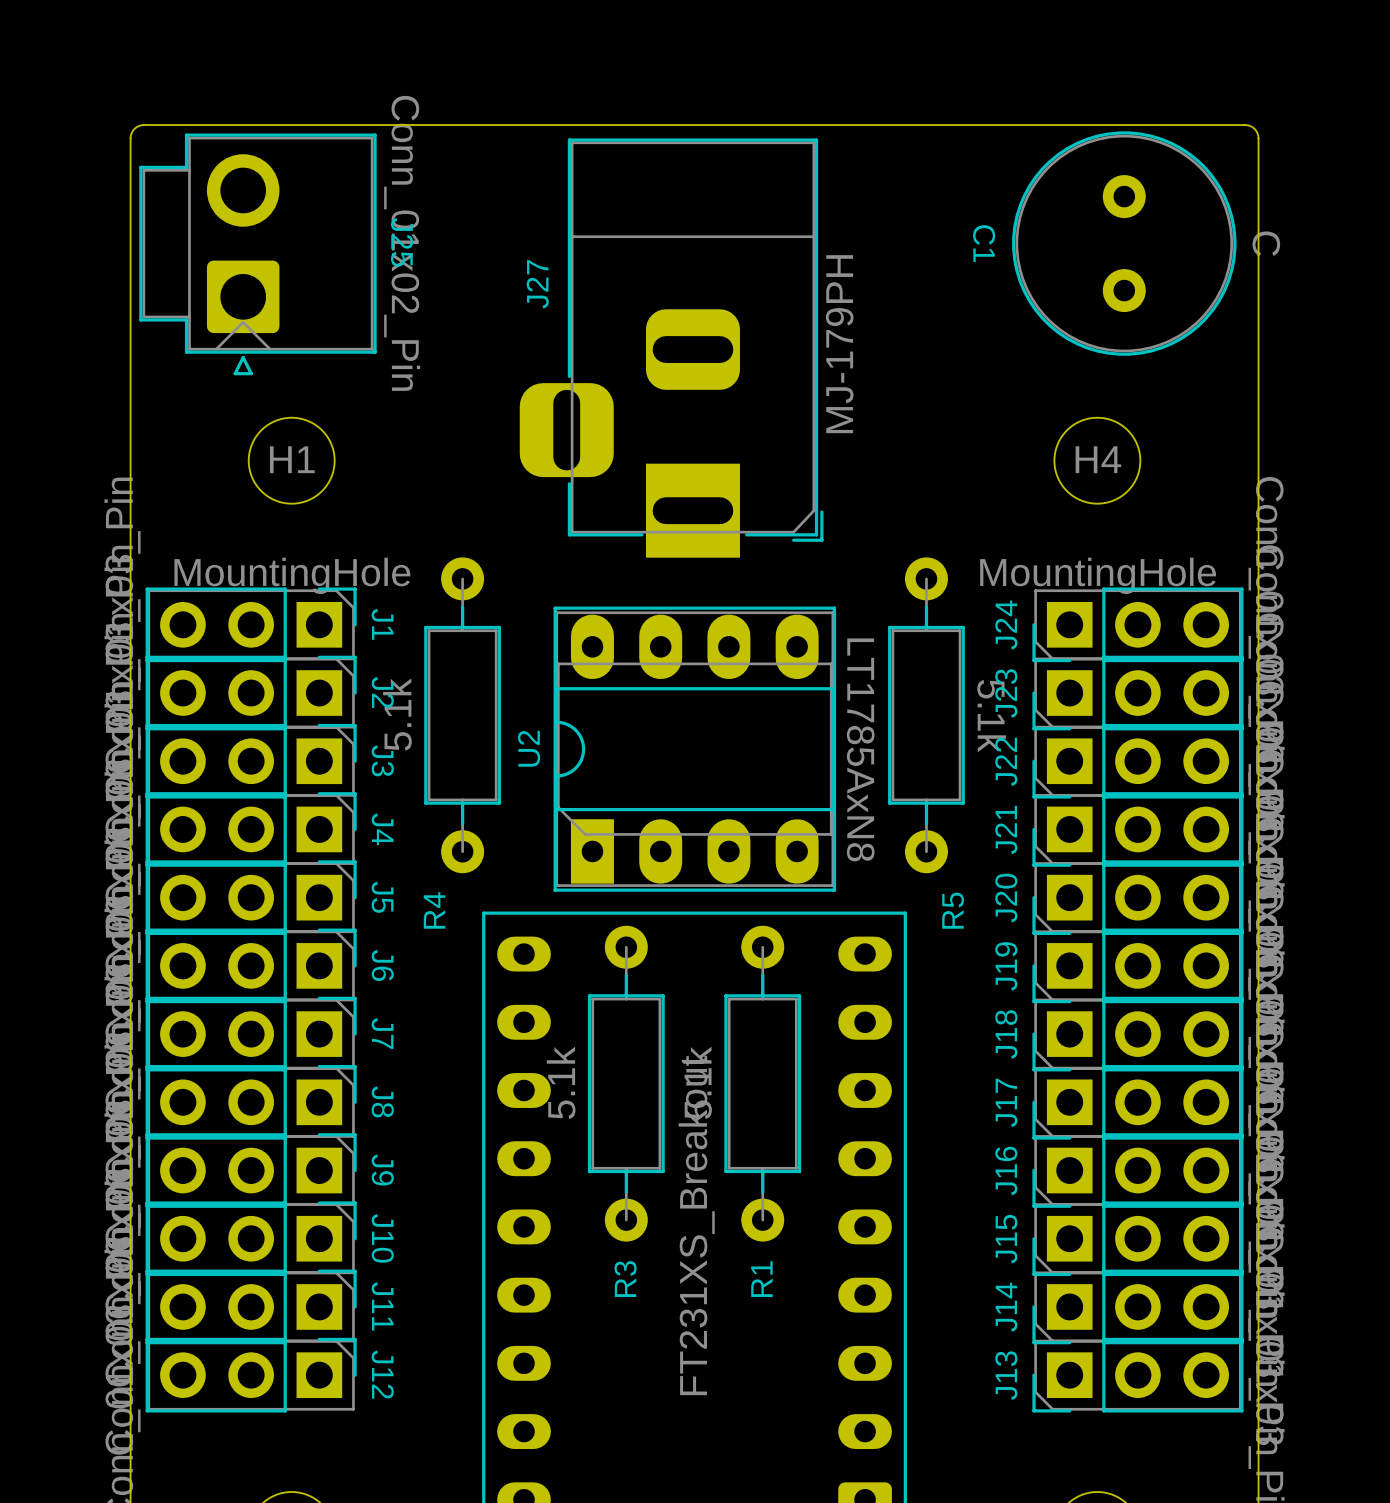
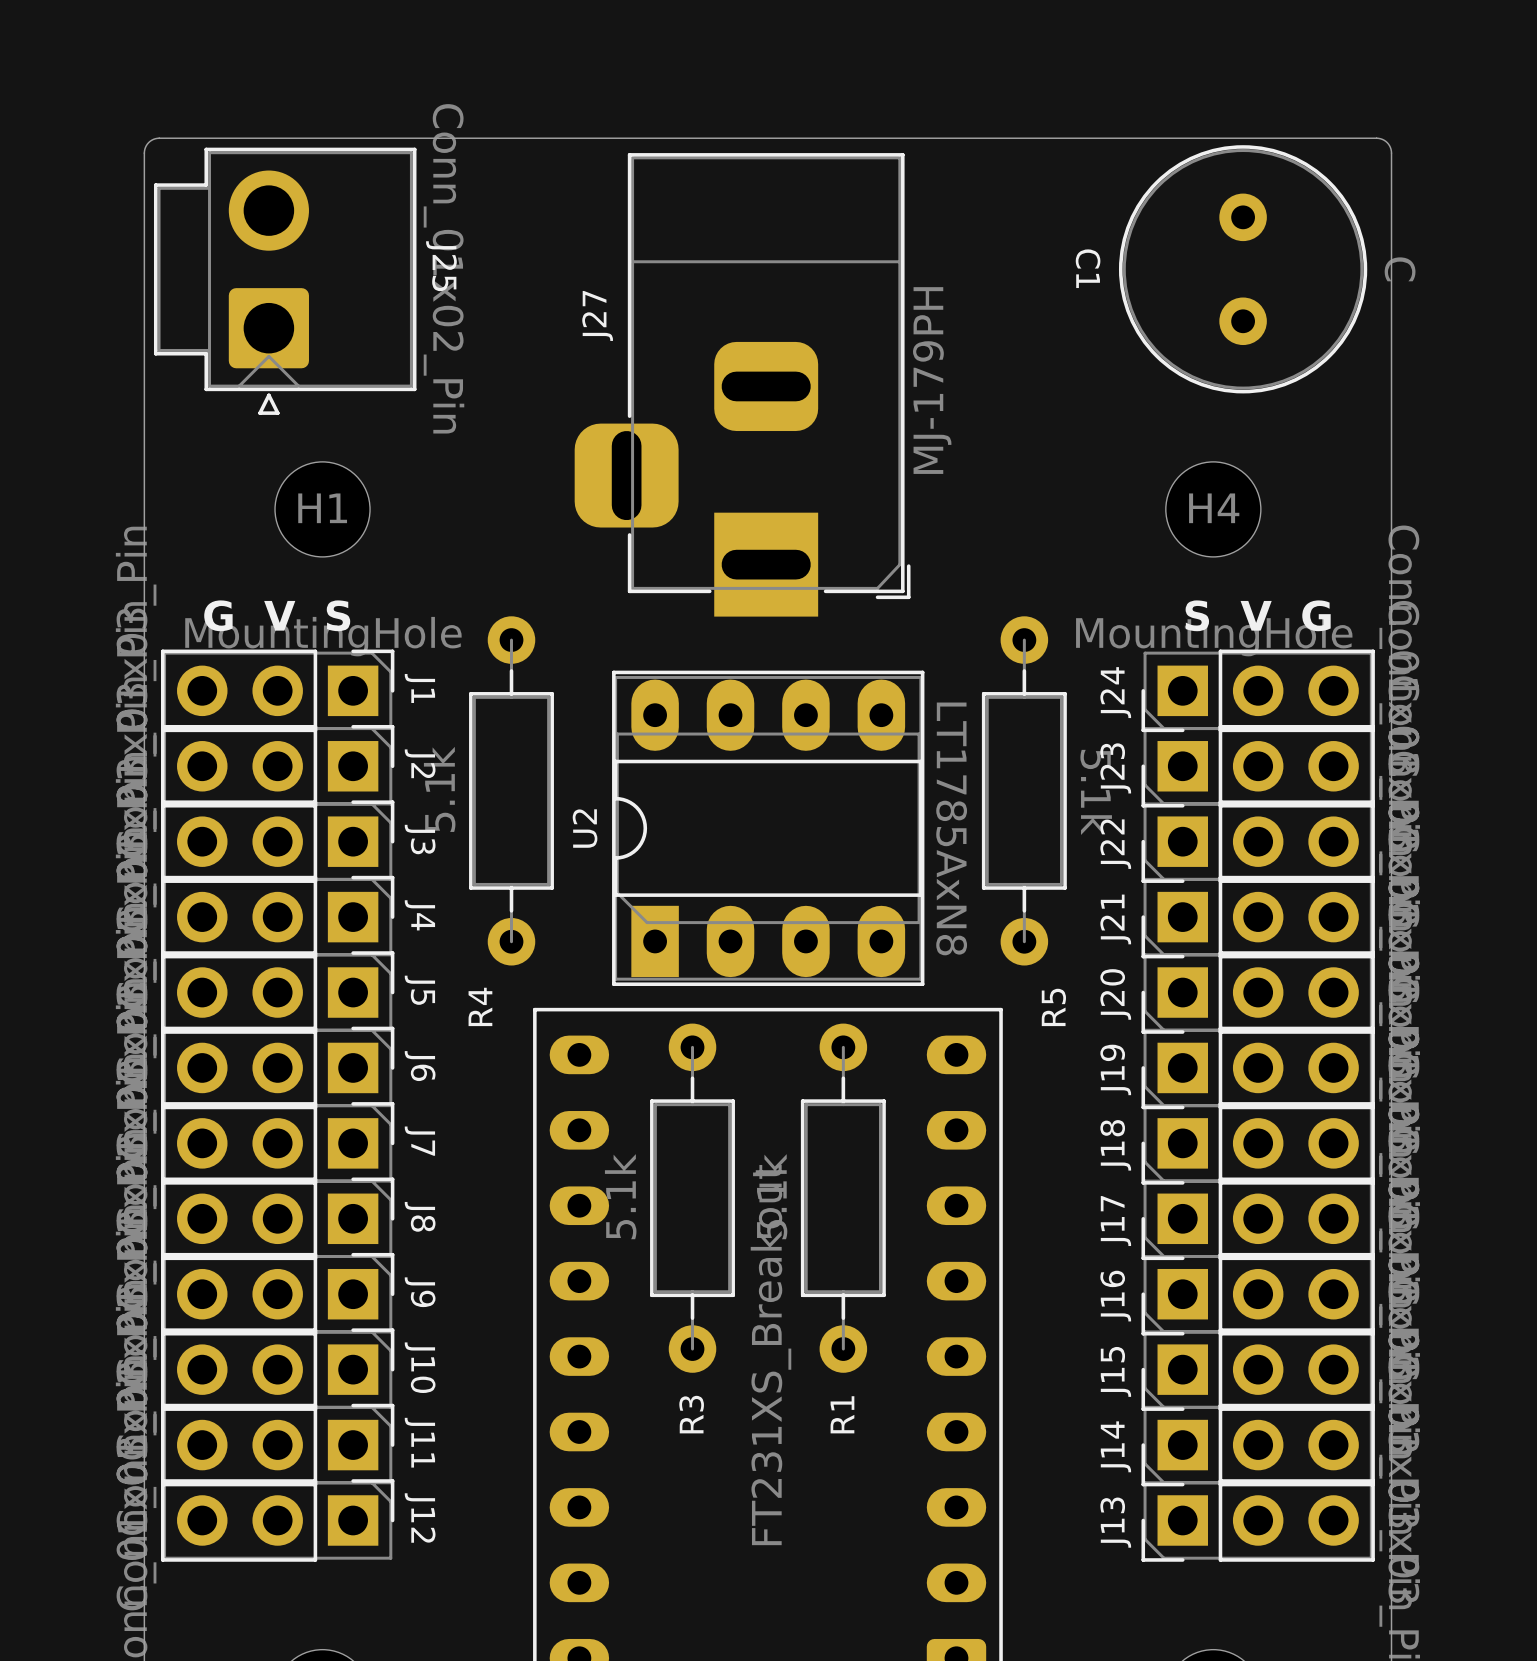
text: none -> G V S (277, 615)
text: none -> S V G (1258, 615)

